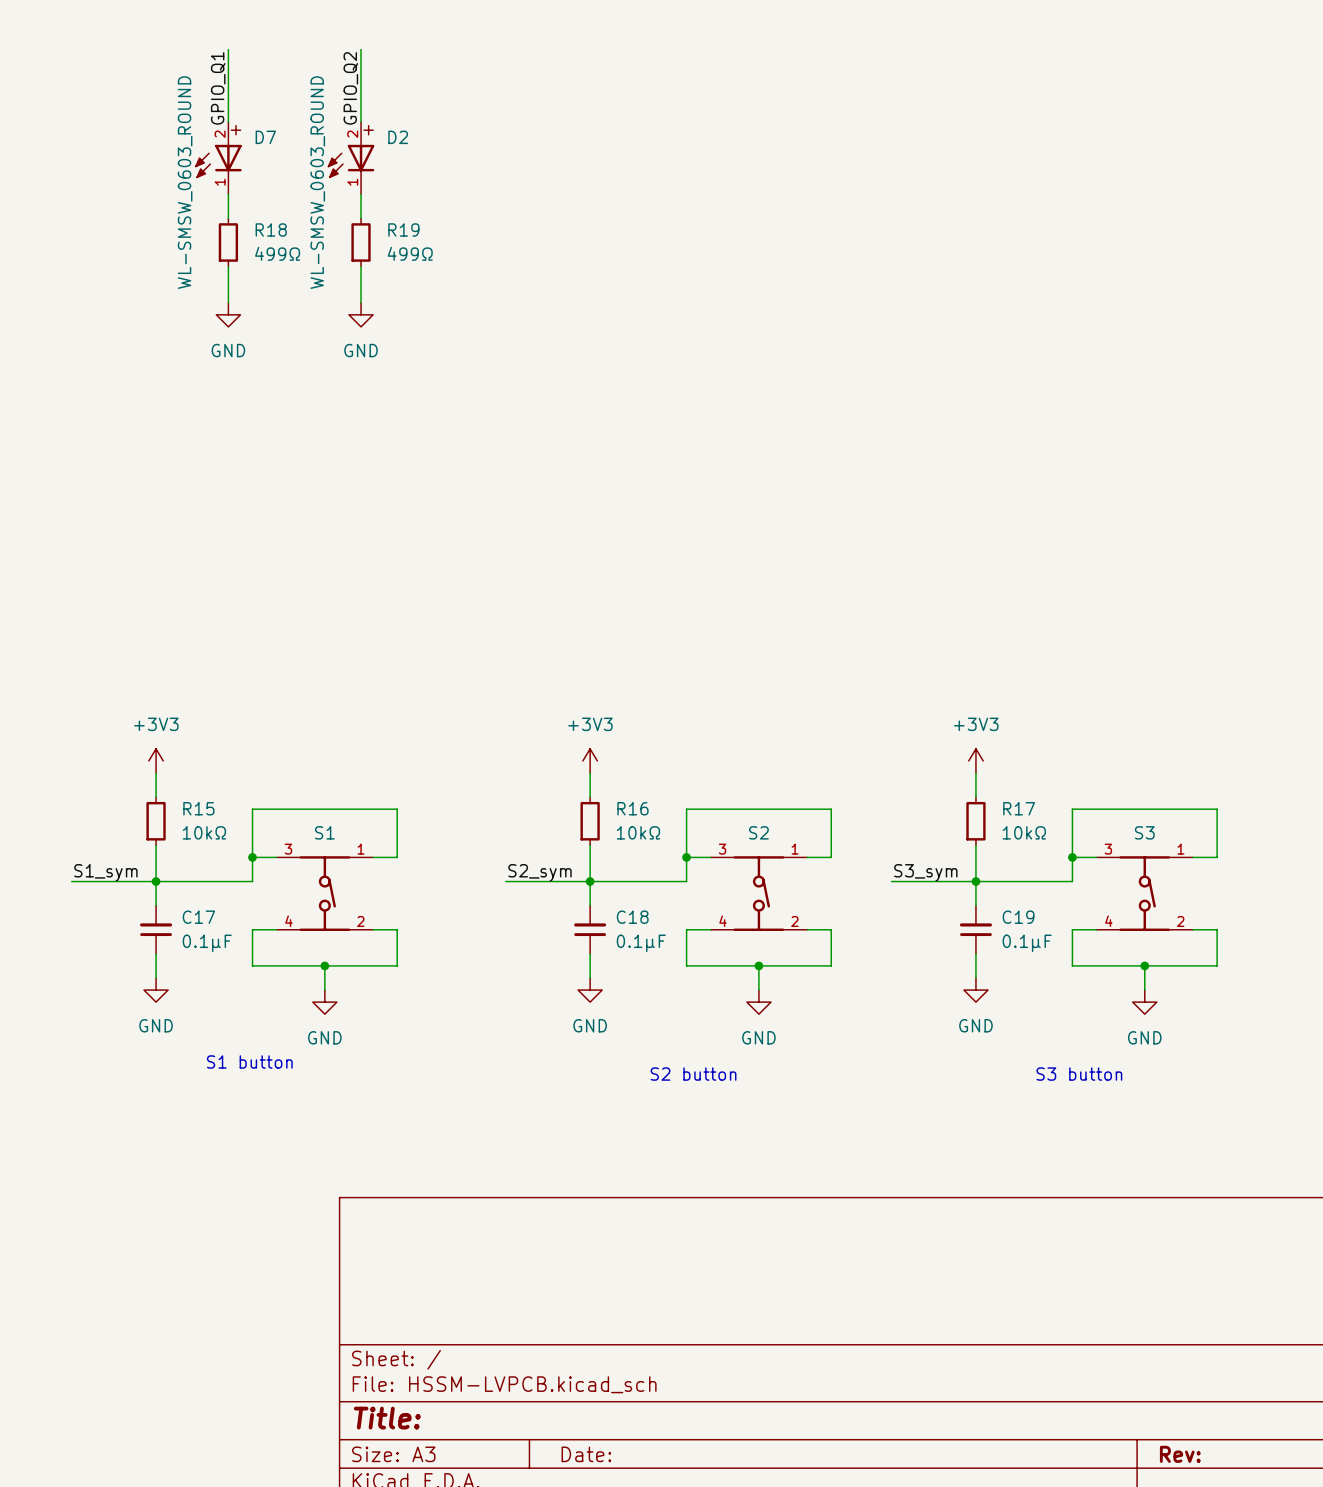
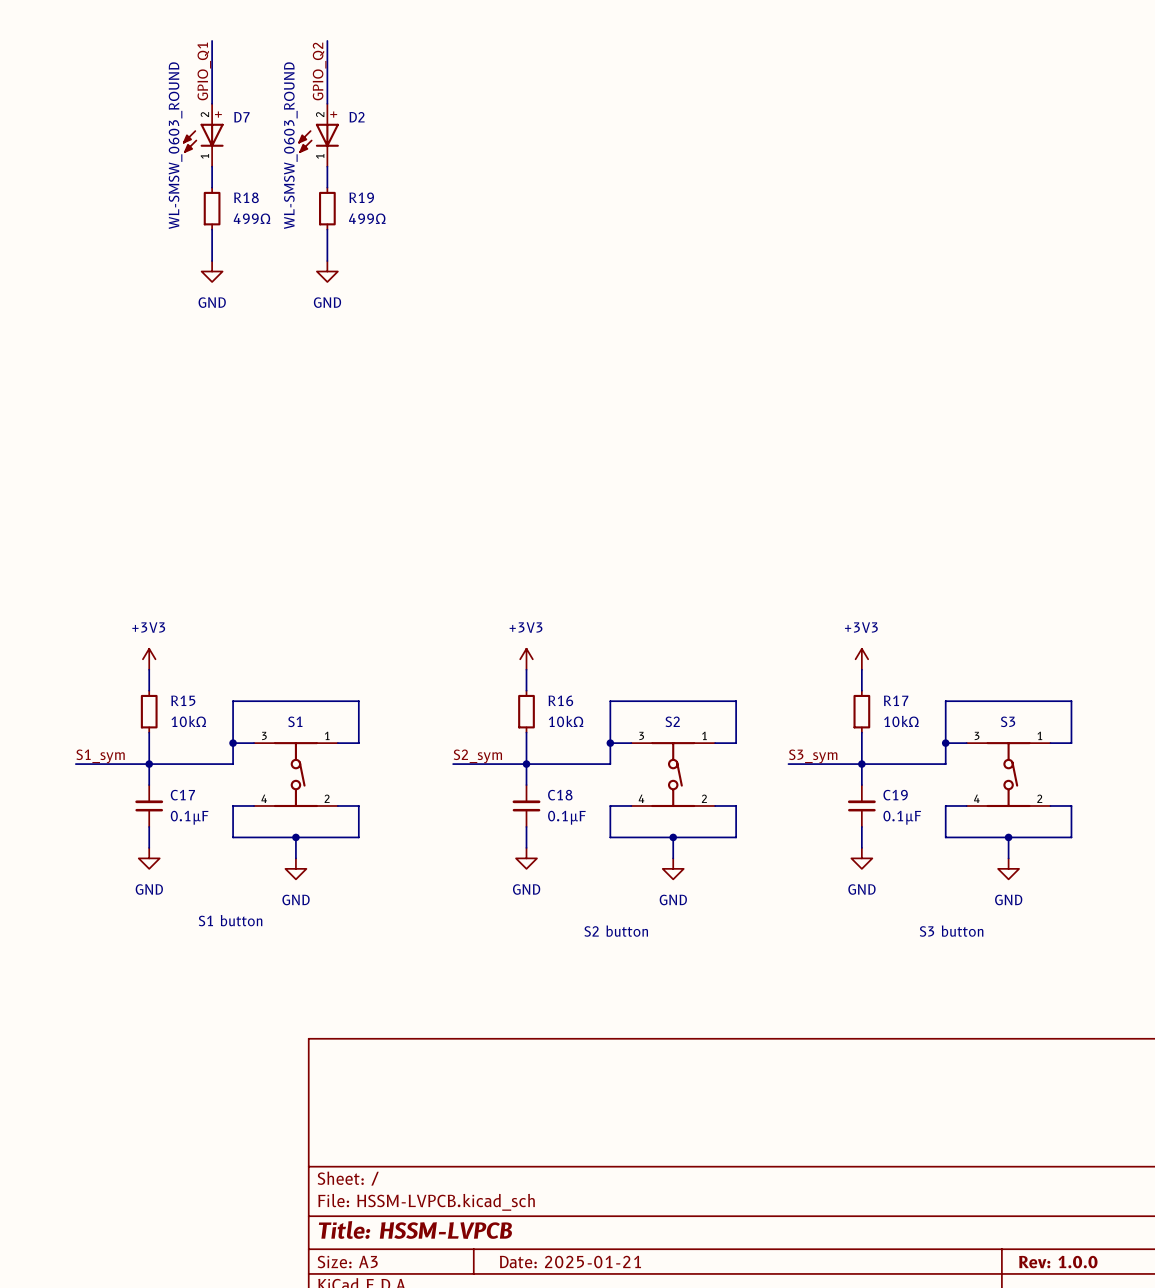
title block: Title: (387, 1418) -> Title: HSSM-LVPCB (415, 1230)
title block: Date: (586, 1454) -> Date: 2025-01-21 (570, 1262)
title block: Rev: (1180, 1454) -> Rev: 1.0.0 (1058, 1262)

